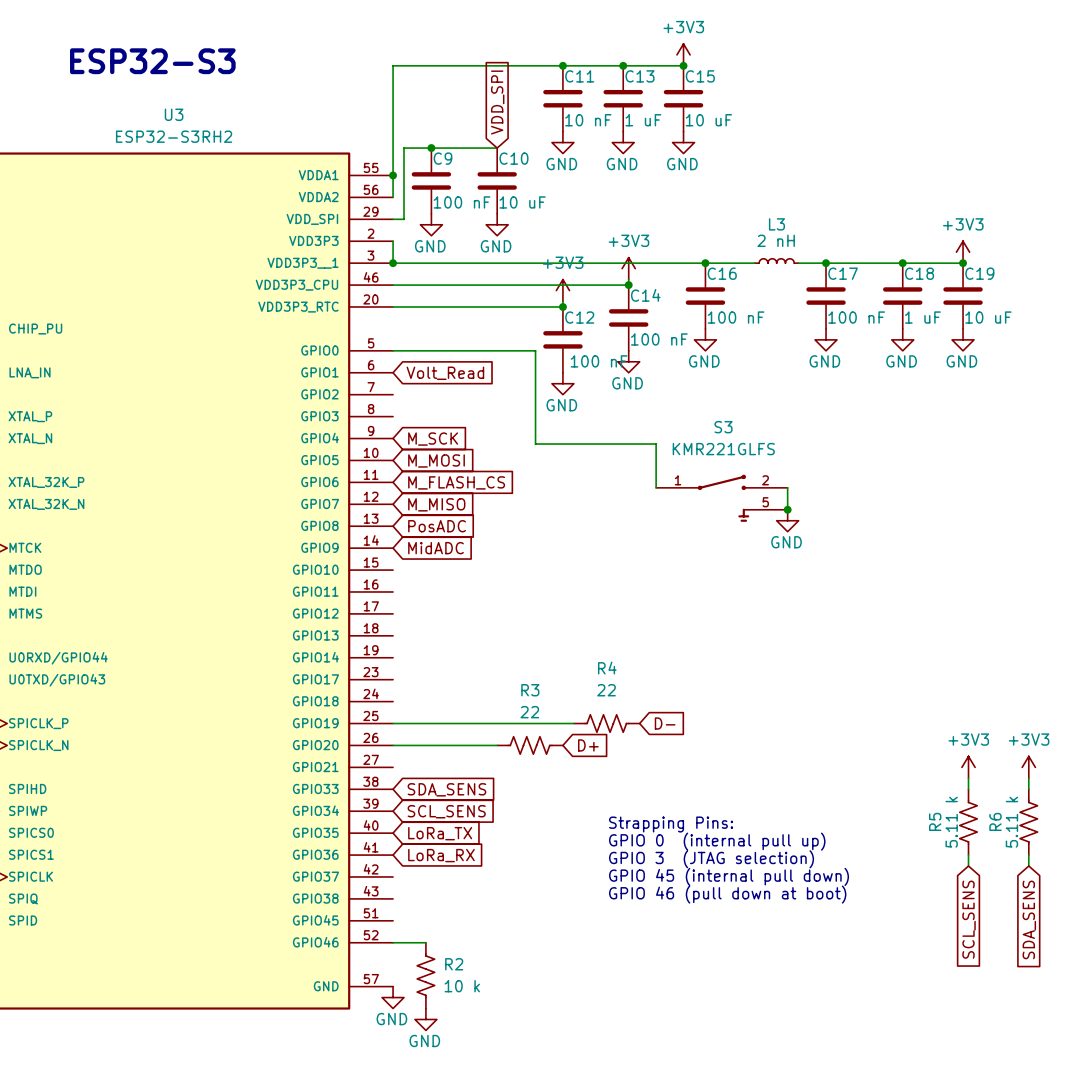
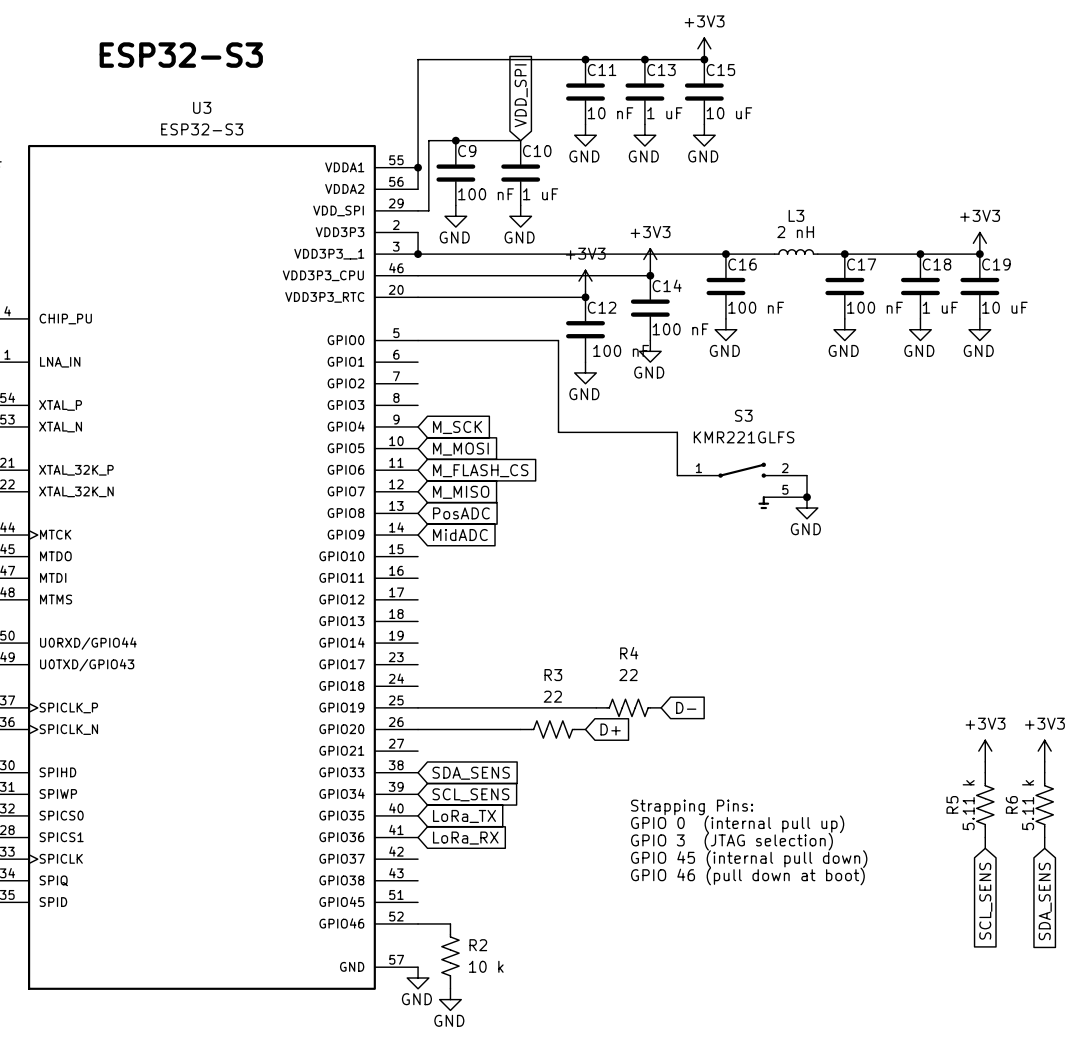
U3 value: ESP32-S3RH2 (174, 136) -> ESP32-S3 (202, 129)
C10 value: 10 uF (522, 202) -> 1 uF (540, 194)
global label: Volt_Read (445, 373) -> none

